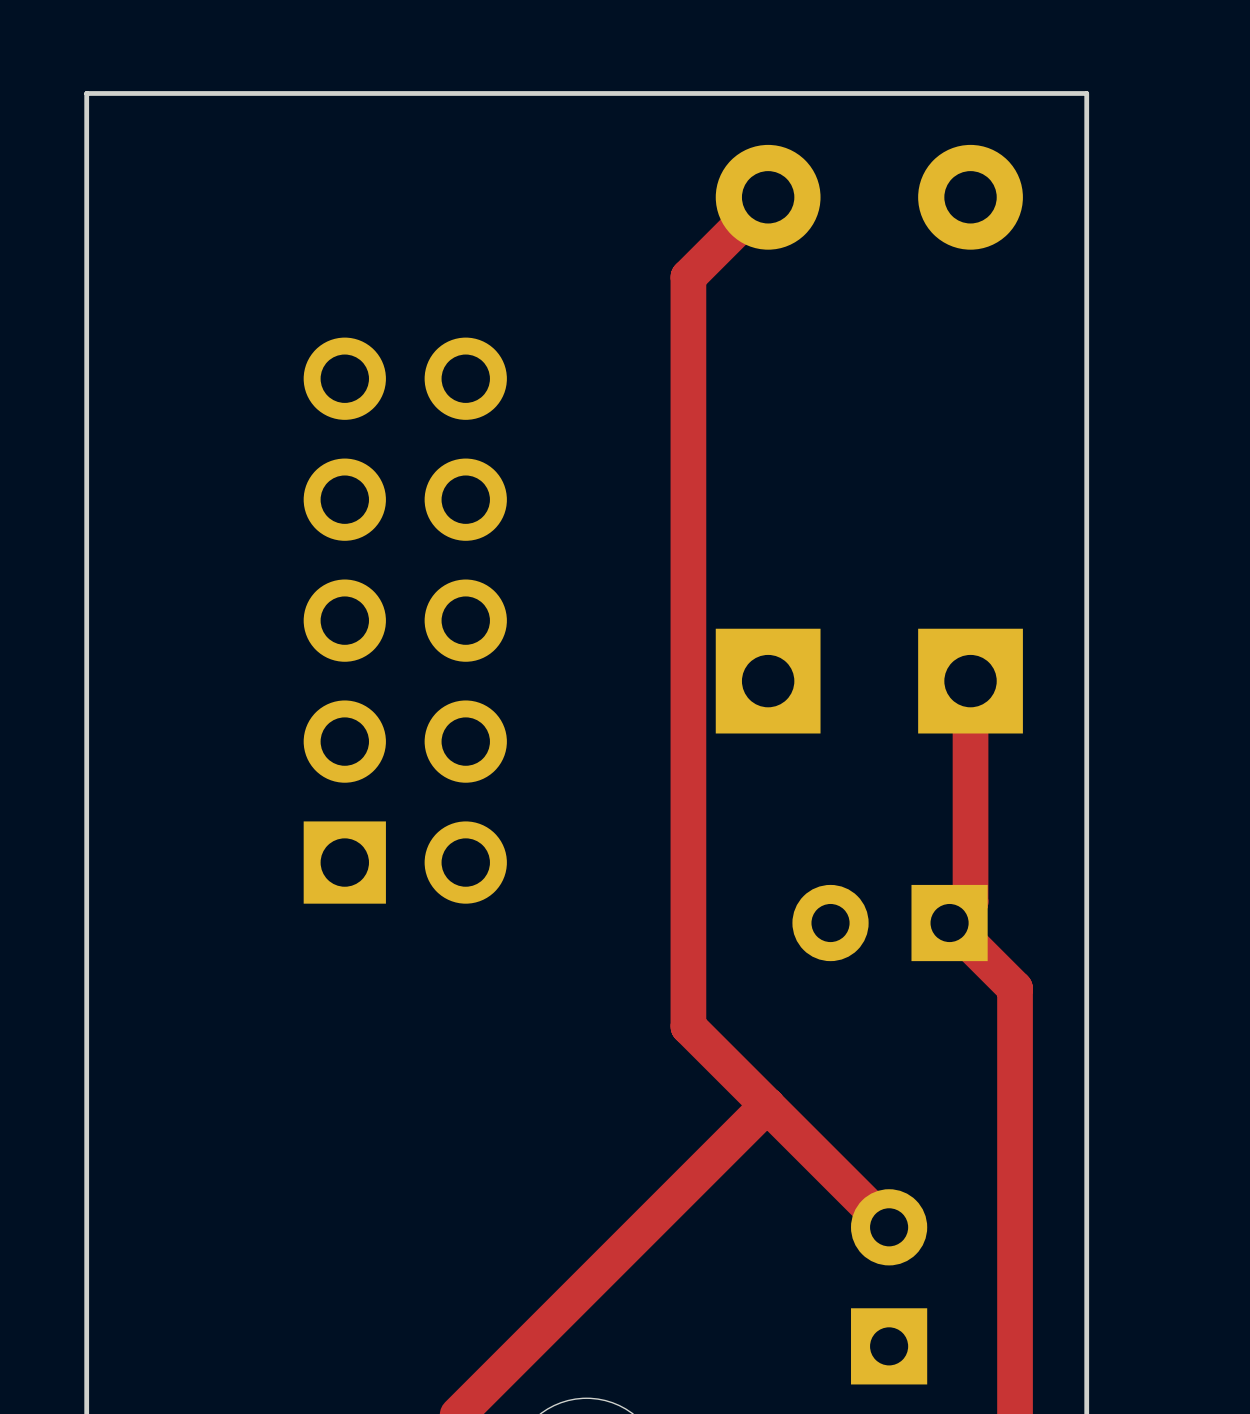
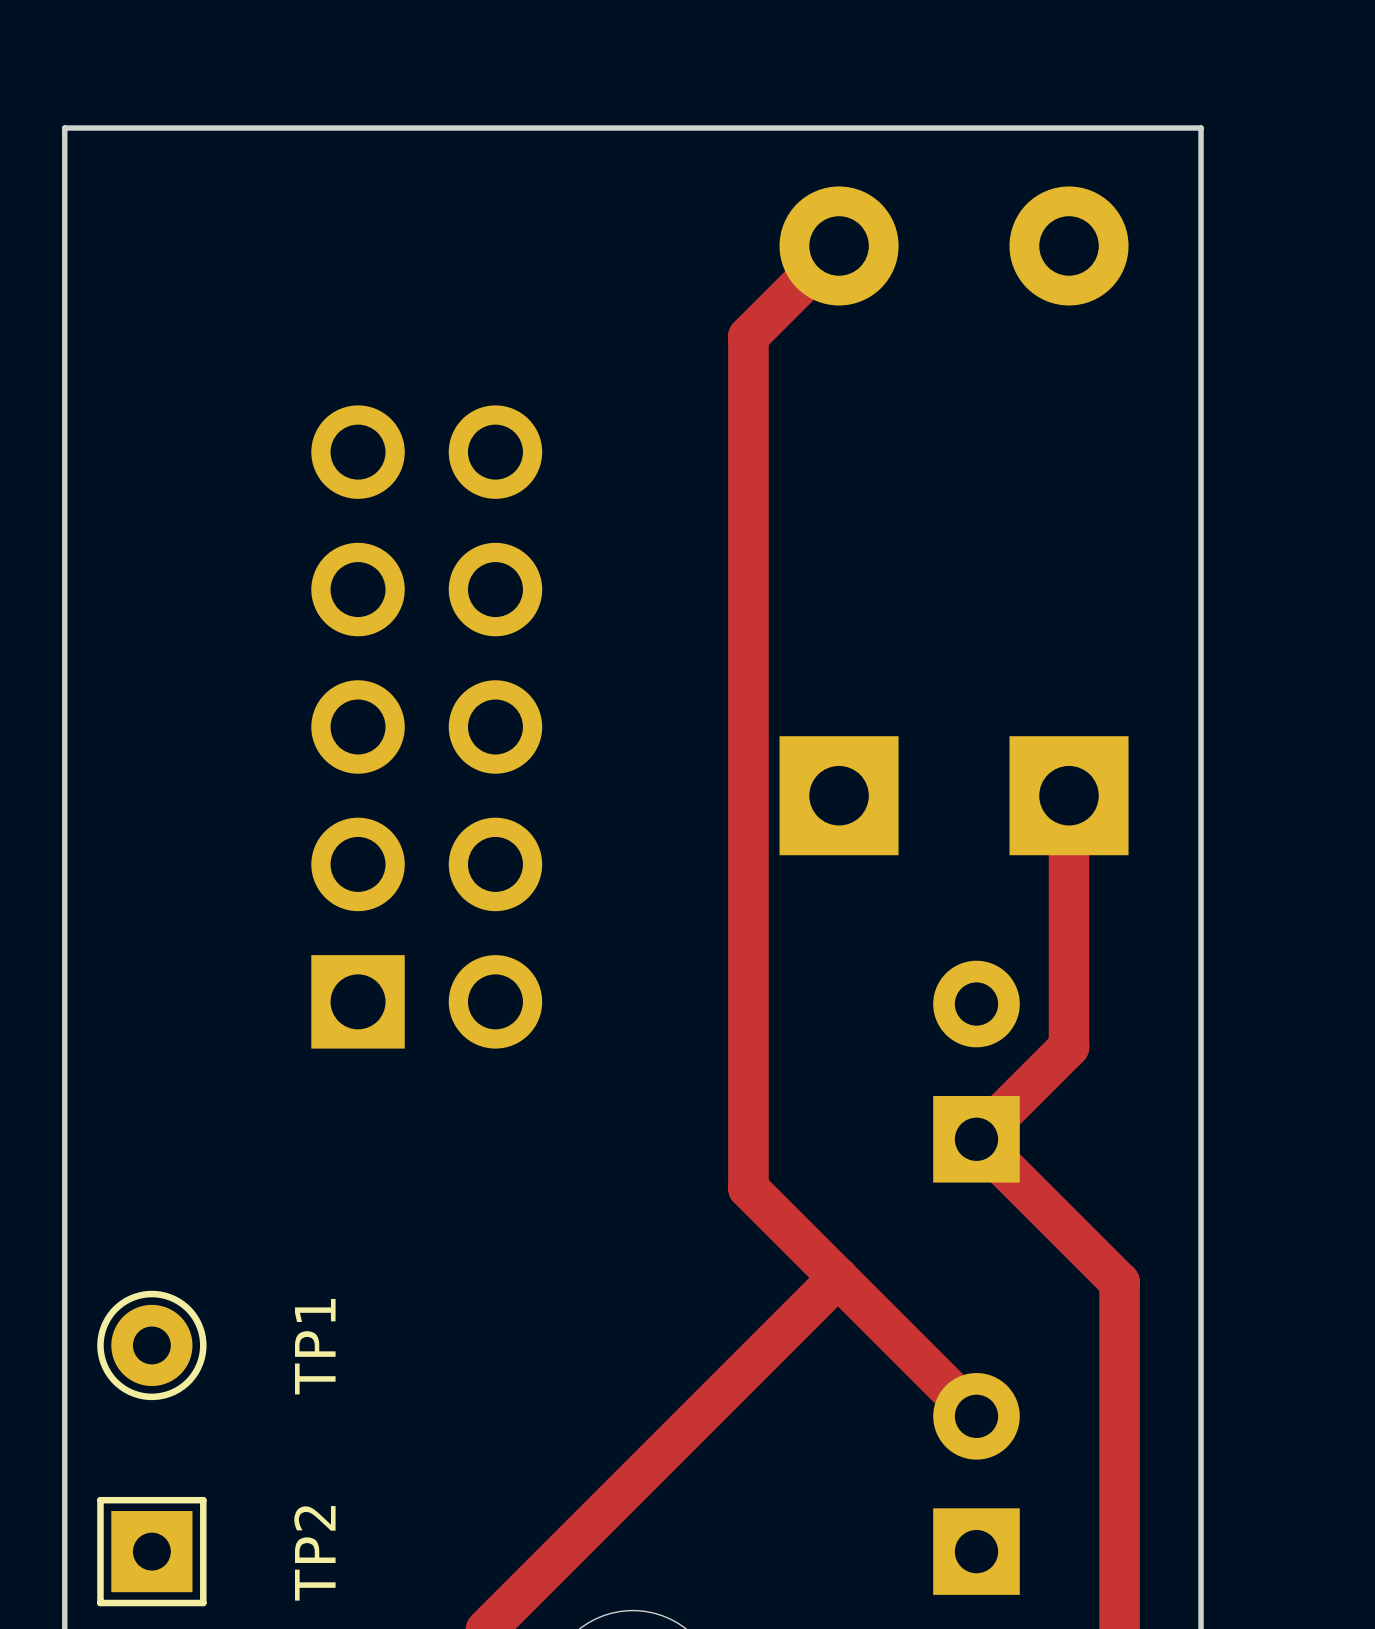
part rotation: 0° (890, 923) -> 90° clockwise (976, 1071)
track: (949, 923) (1015, 988) (1015, 1109) -> (1045, 1070) (976, 1139) (1119, 1282)
TP1: none -> (151, 1345)
TP2: none -> (151, 1551)

